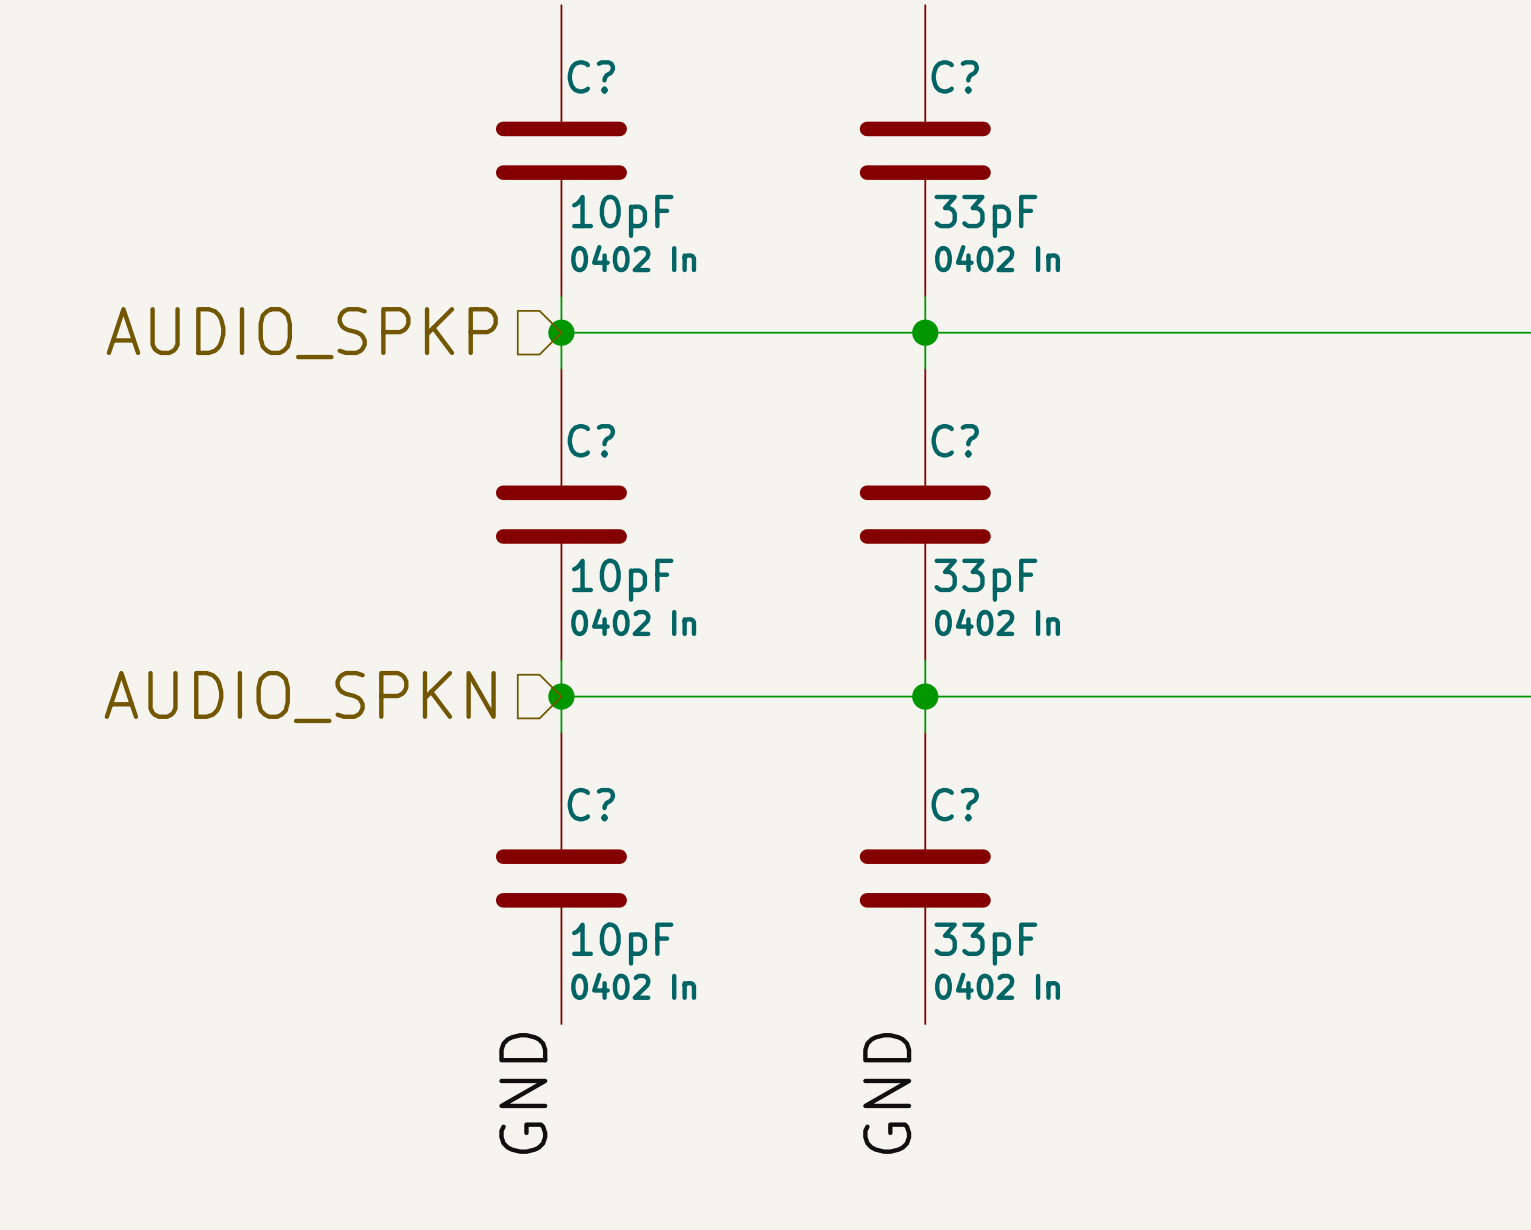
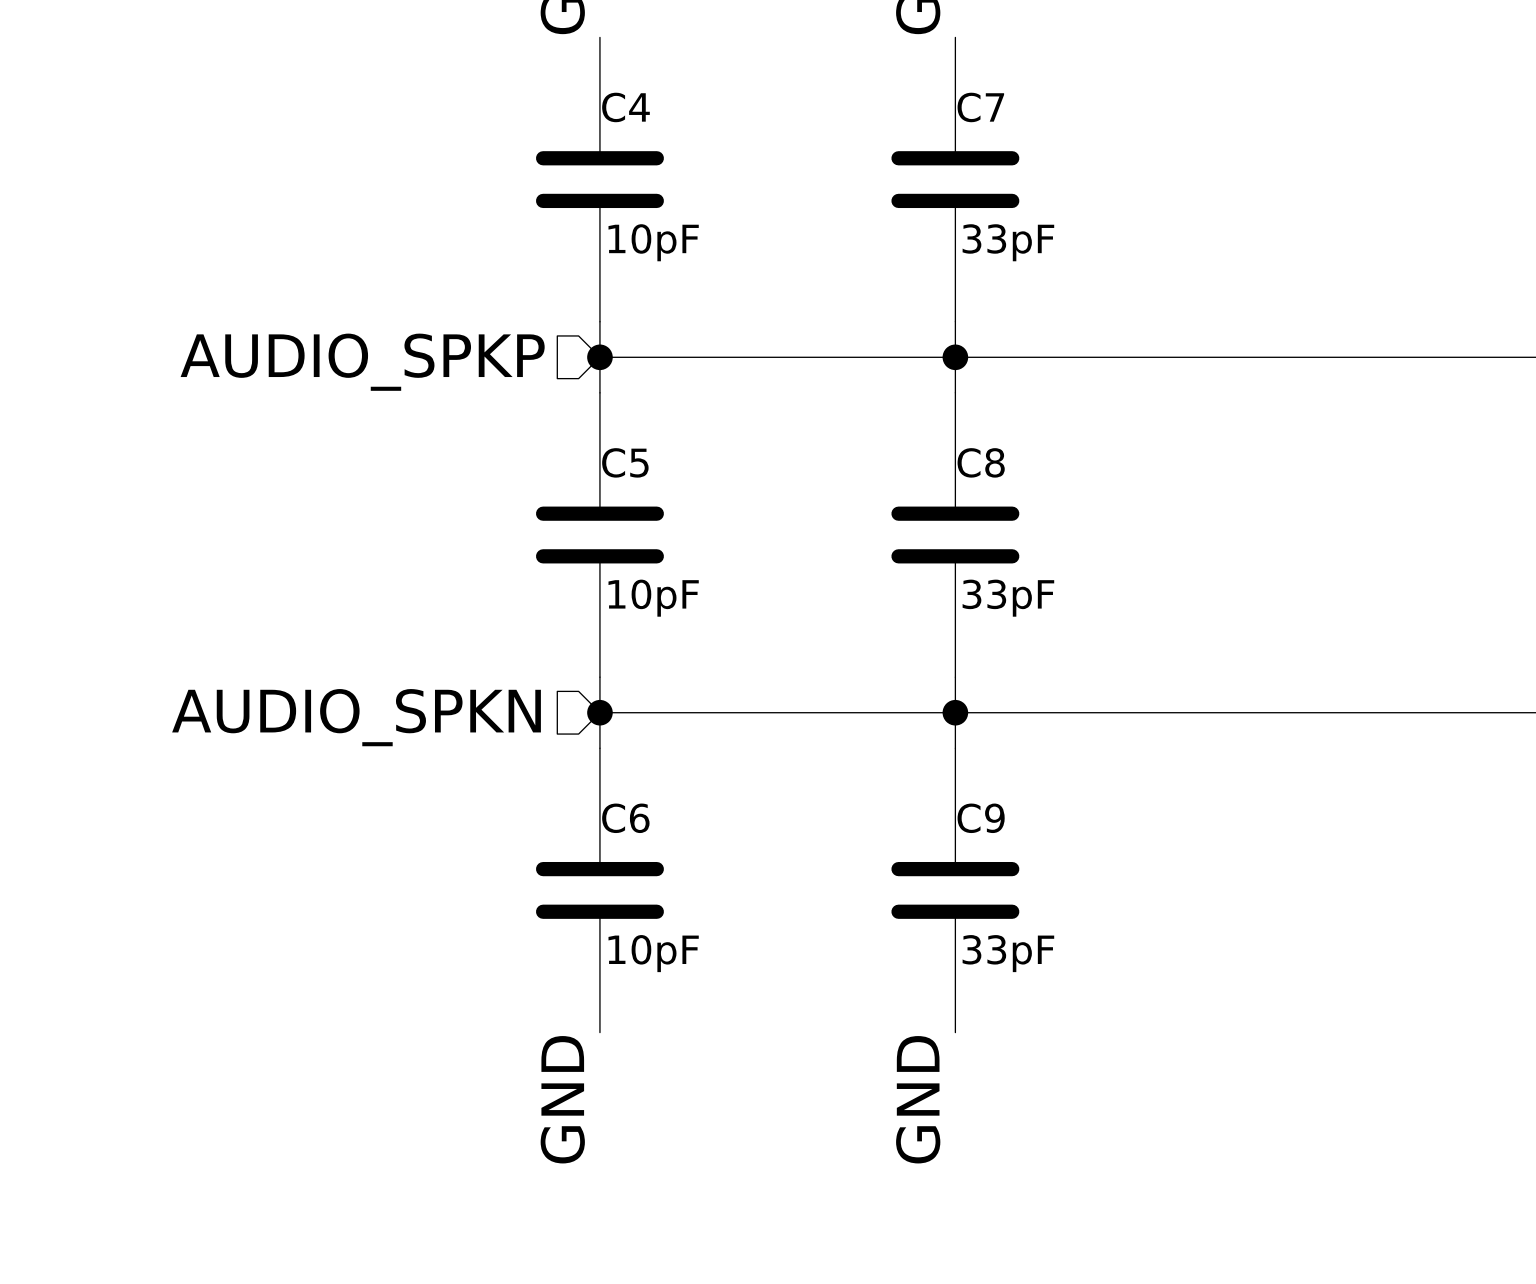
C? name: C? (591, 76) -> C4 (625, 107)
C? name: C? (955, 76) -> C7 (980, 107)
C? text: 0402 In (633, 258) -> none
C? text: 0402 In (997, 258) -> none
C? name: C? (591, 440) -> C5 (625, 462)
C? name: C? (955, 440) -> C8 (981, 462)
C? text: 0402 In (633, 622) -> none
C? text: 0402 In (997, 622) -> none
C? name: C? (591, 804) -> C6 (625, 818)
C? name: C? (955, 804) -> C9 (981, 818)
C? text: 0402 In (633, 986) -> none
C? text: 0402 In (997, 986) -> none

